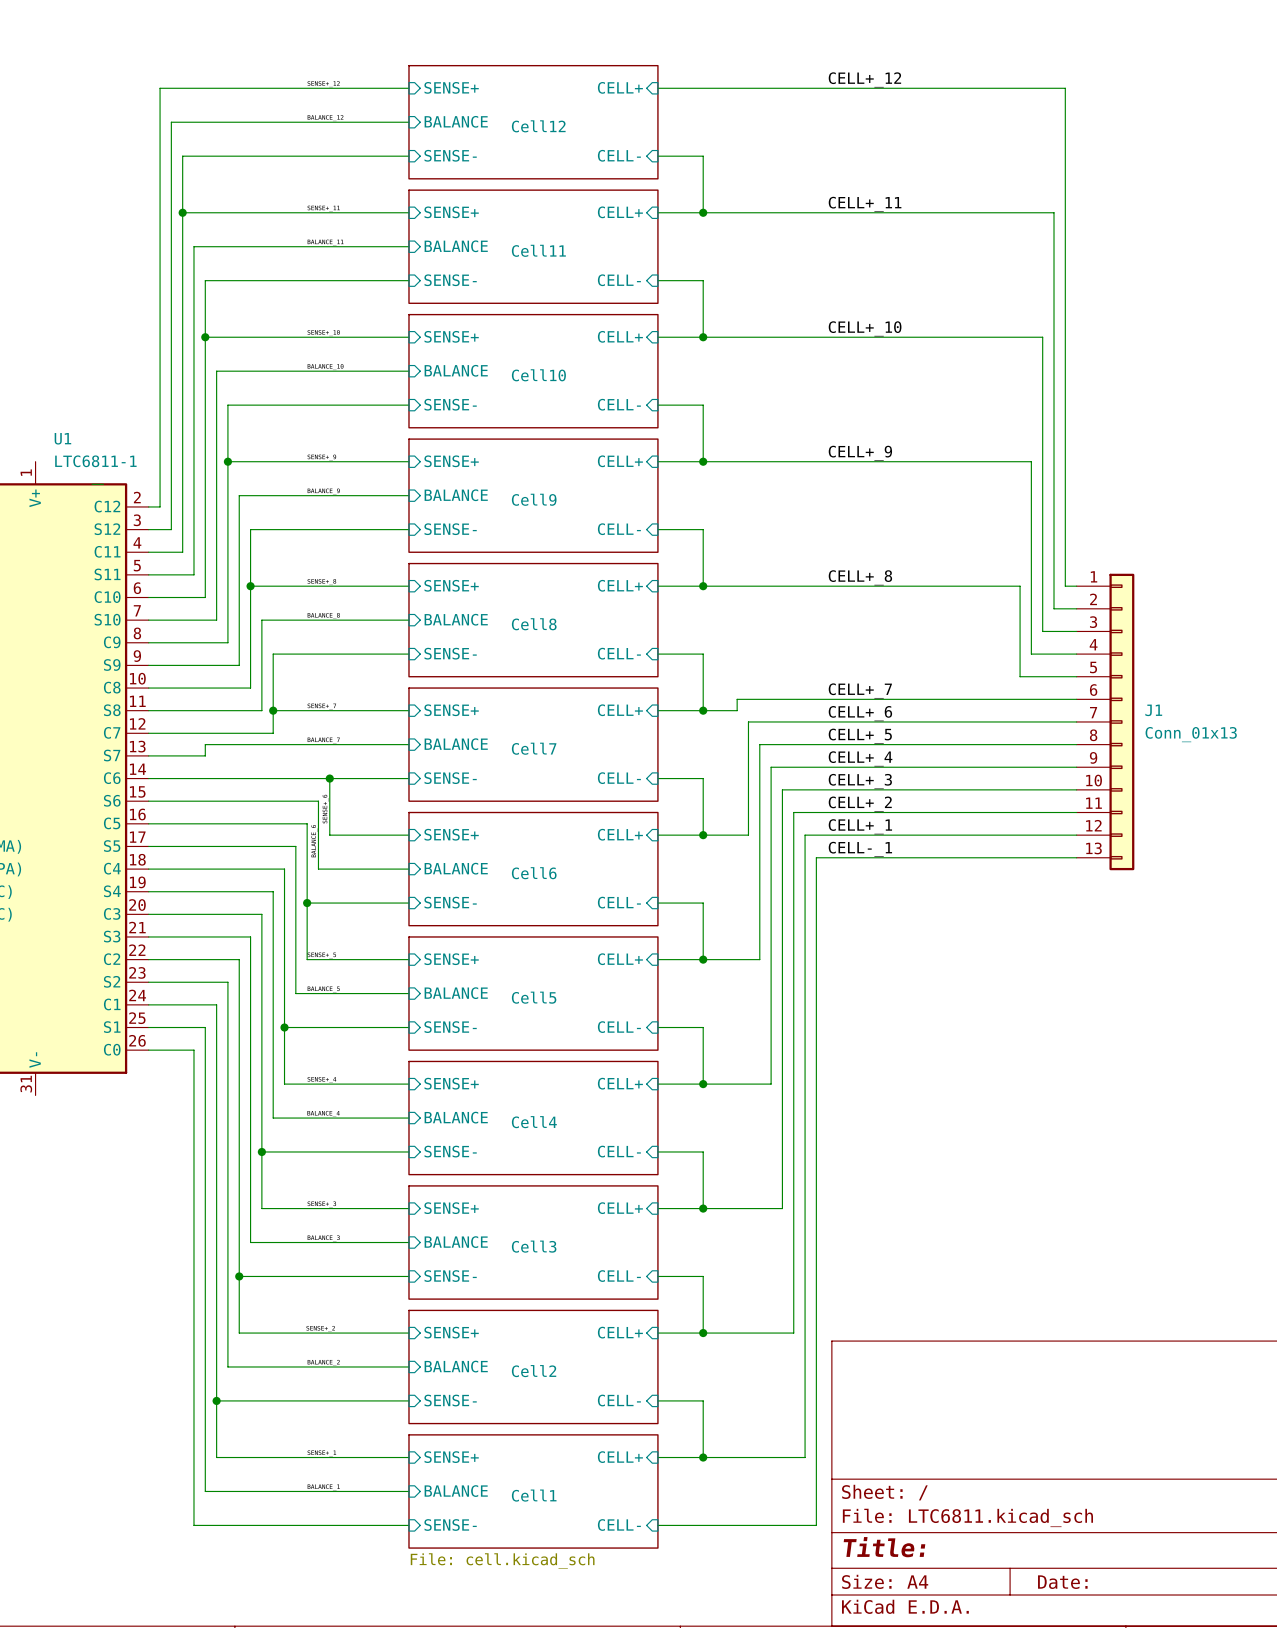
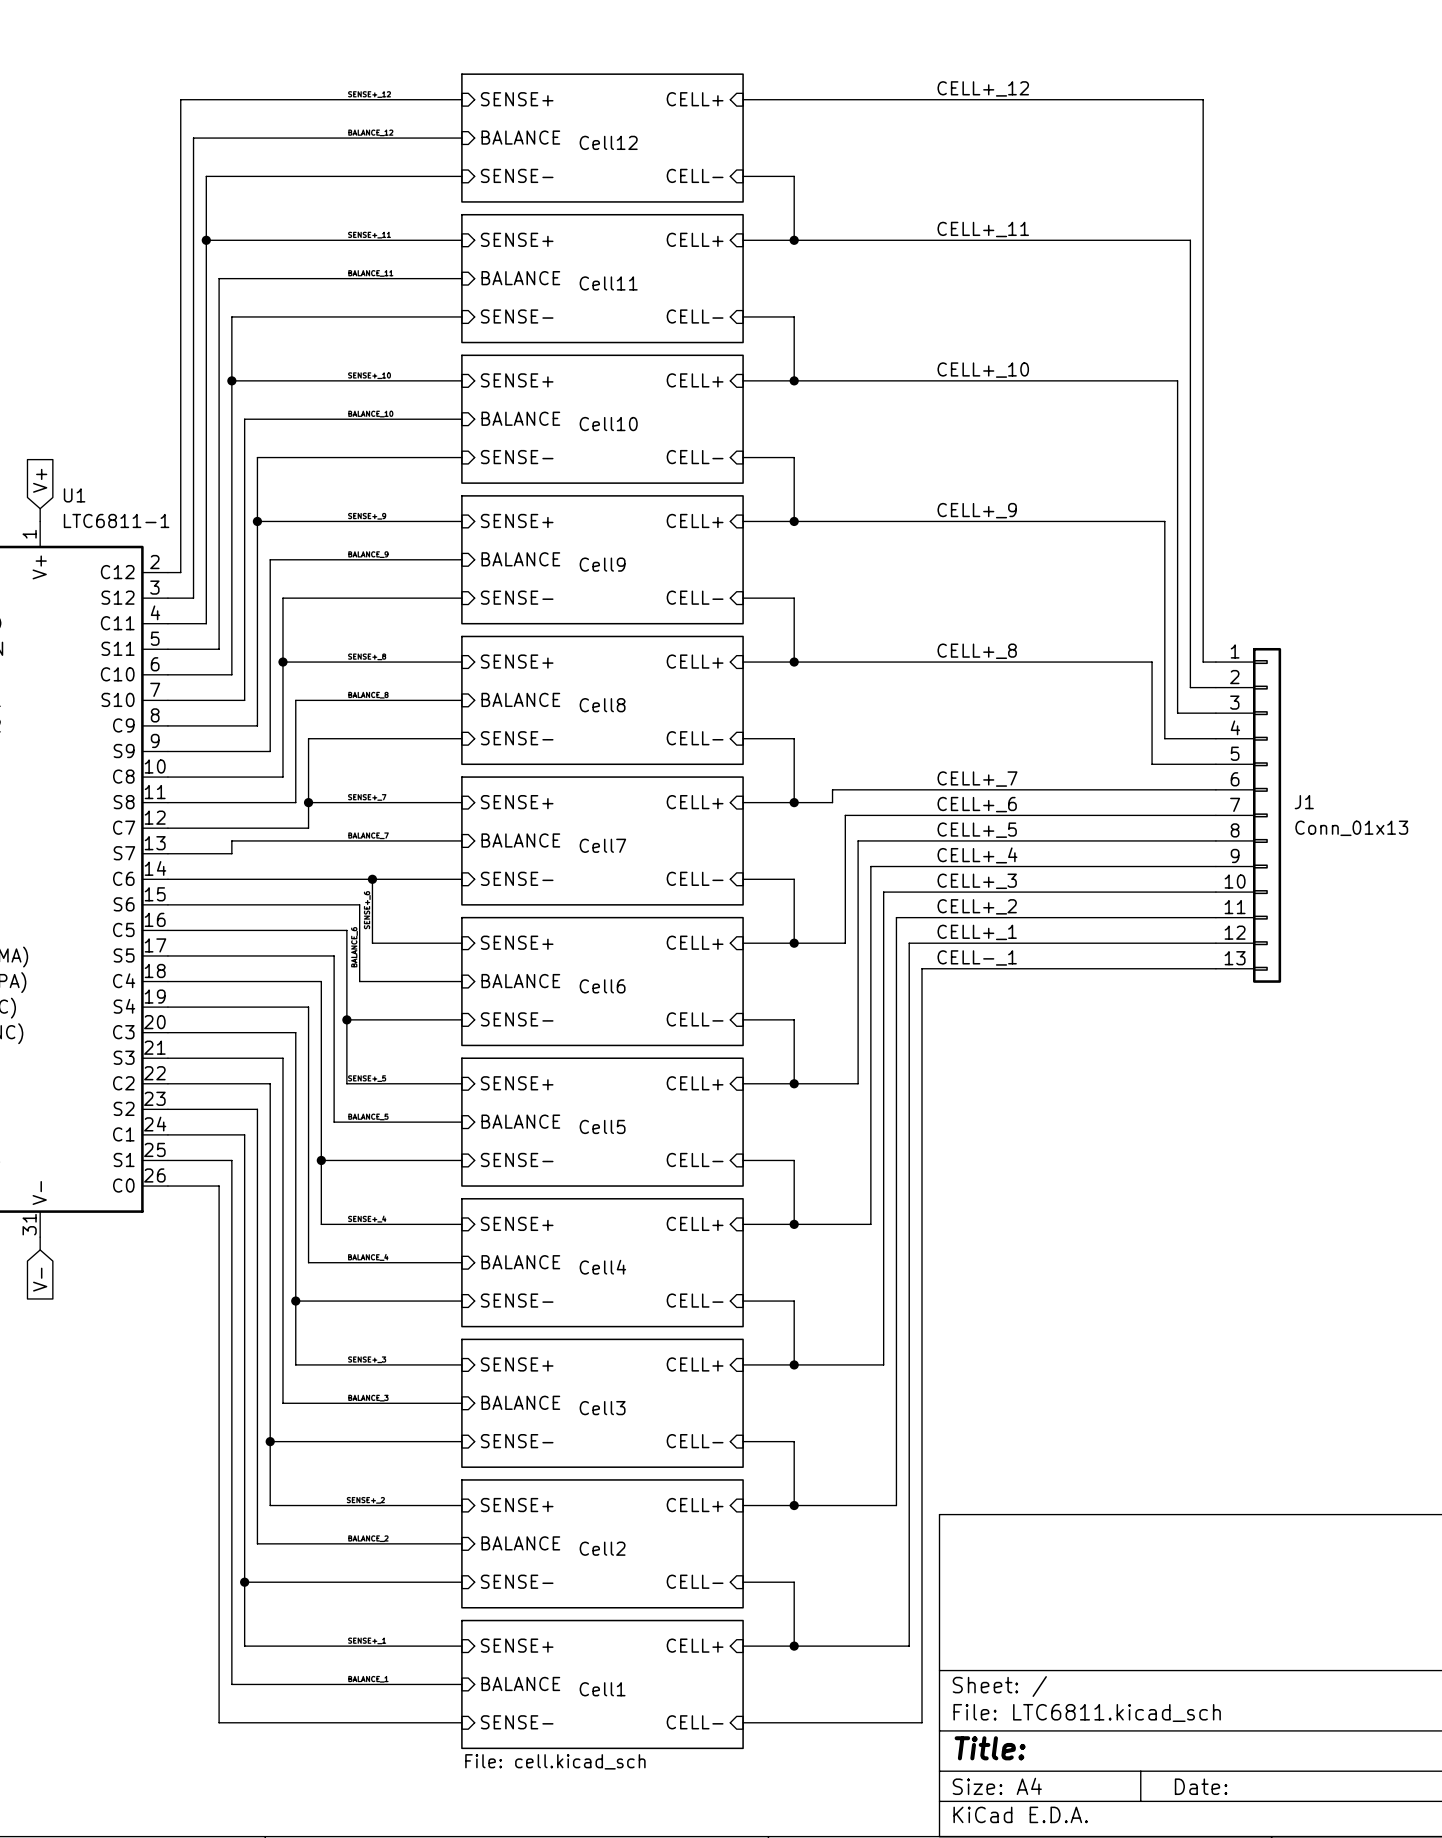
global label: none -> V+ (40, 480)
wire: none -> (40, 508) (40, 521)
wire: none -> (40, 1237) (40, 1249)
global label: none -> V- (40, 1279)

